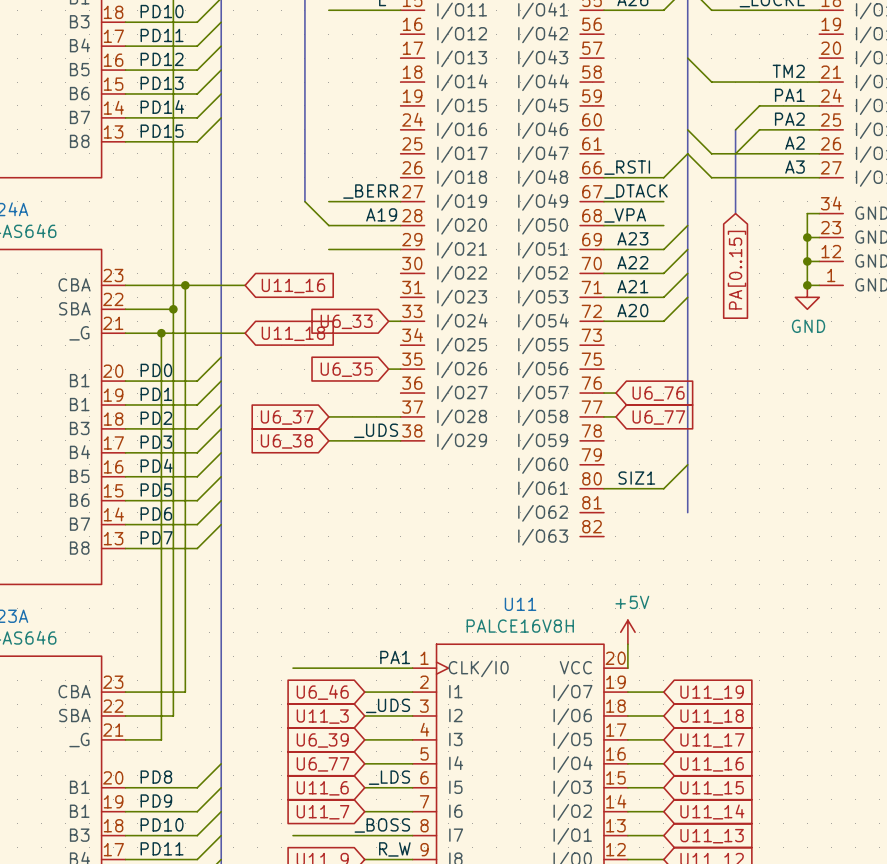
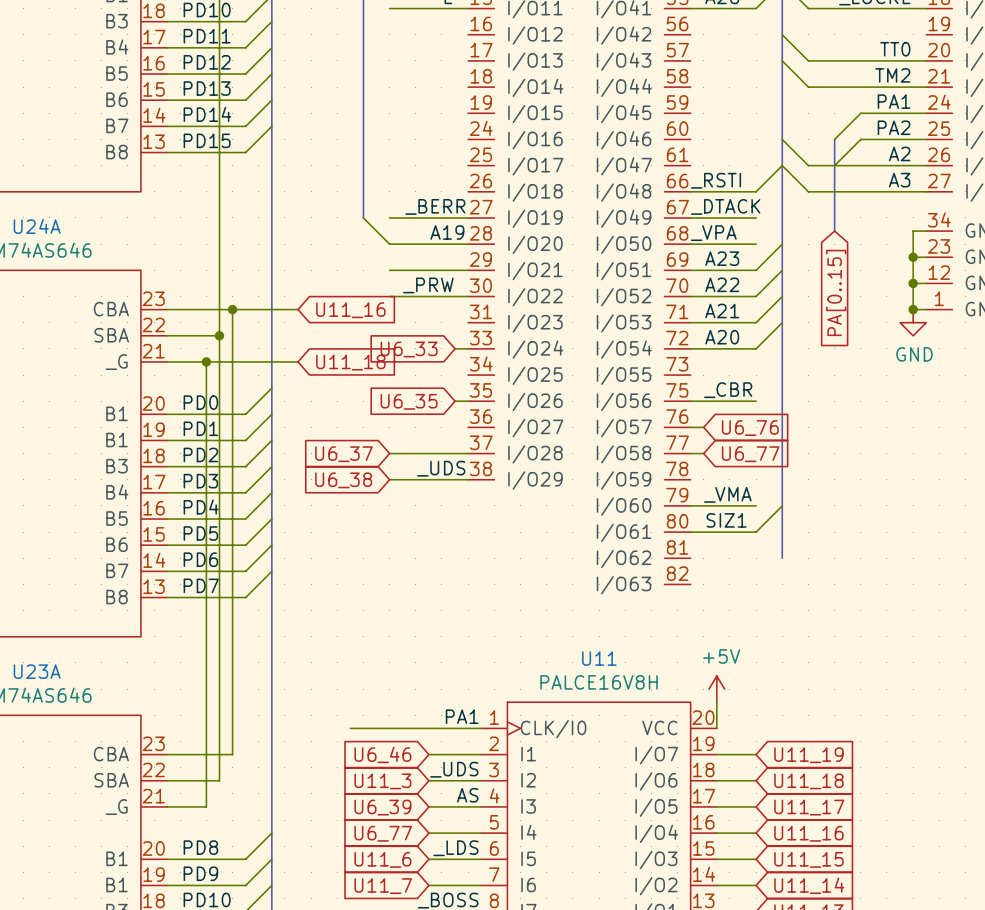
wire: none -> (782, 34) (808, 60) (926, 60)
label: none -> TT0 (895, 49)
label: none -> _PRW (428, 285)
wire: none -> (389, 296) (468, 296)
label: none -> _CBR (728, 390)
wire: none -> (690, 401) (756, 401)
label: none -> _VMA (727, 494)
wire: none -> (690, 505) (756, 505)
label: none -> AS (467, 795)

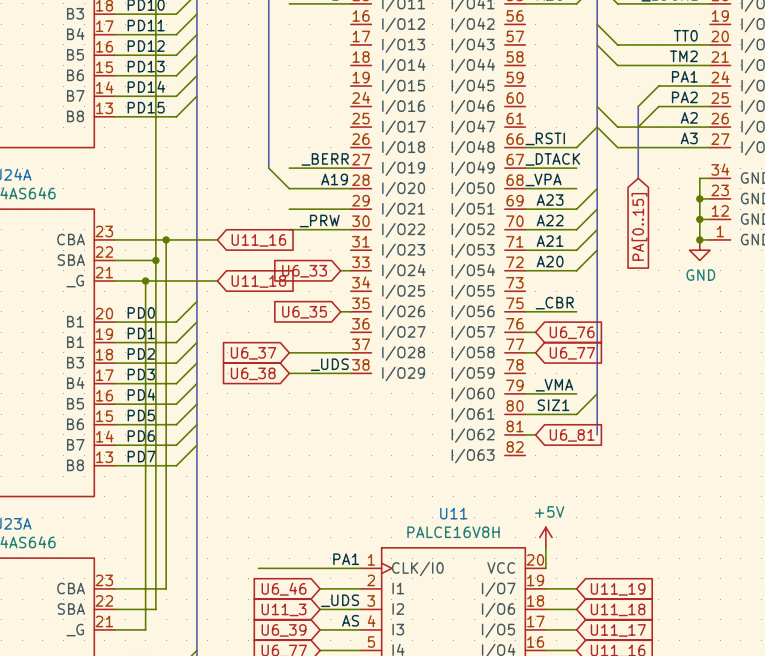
wire: none -> (525, 434) (535, 434)
global label: none -> U6_81 (572, 435)

